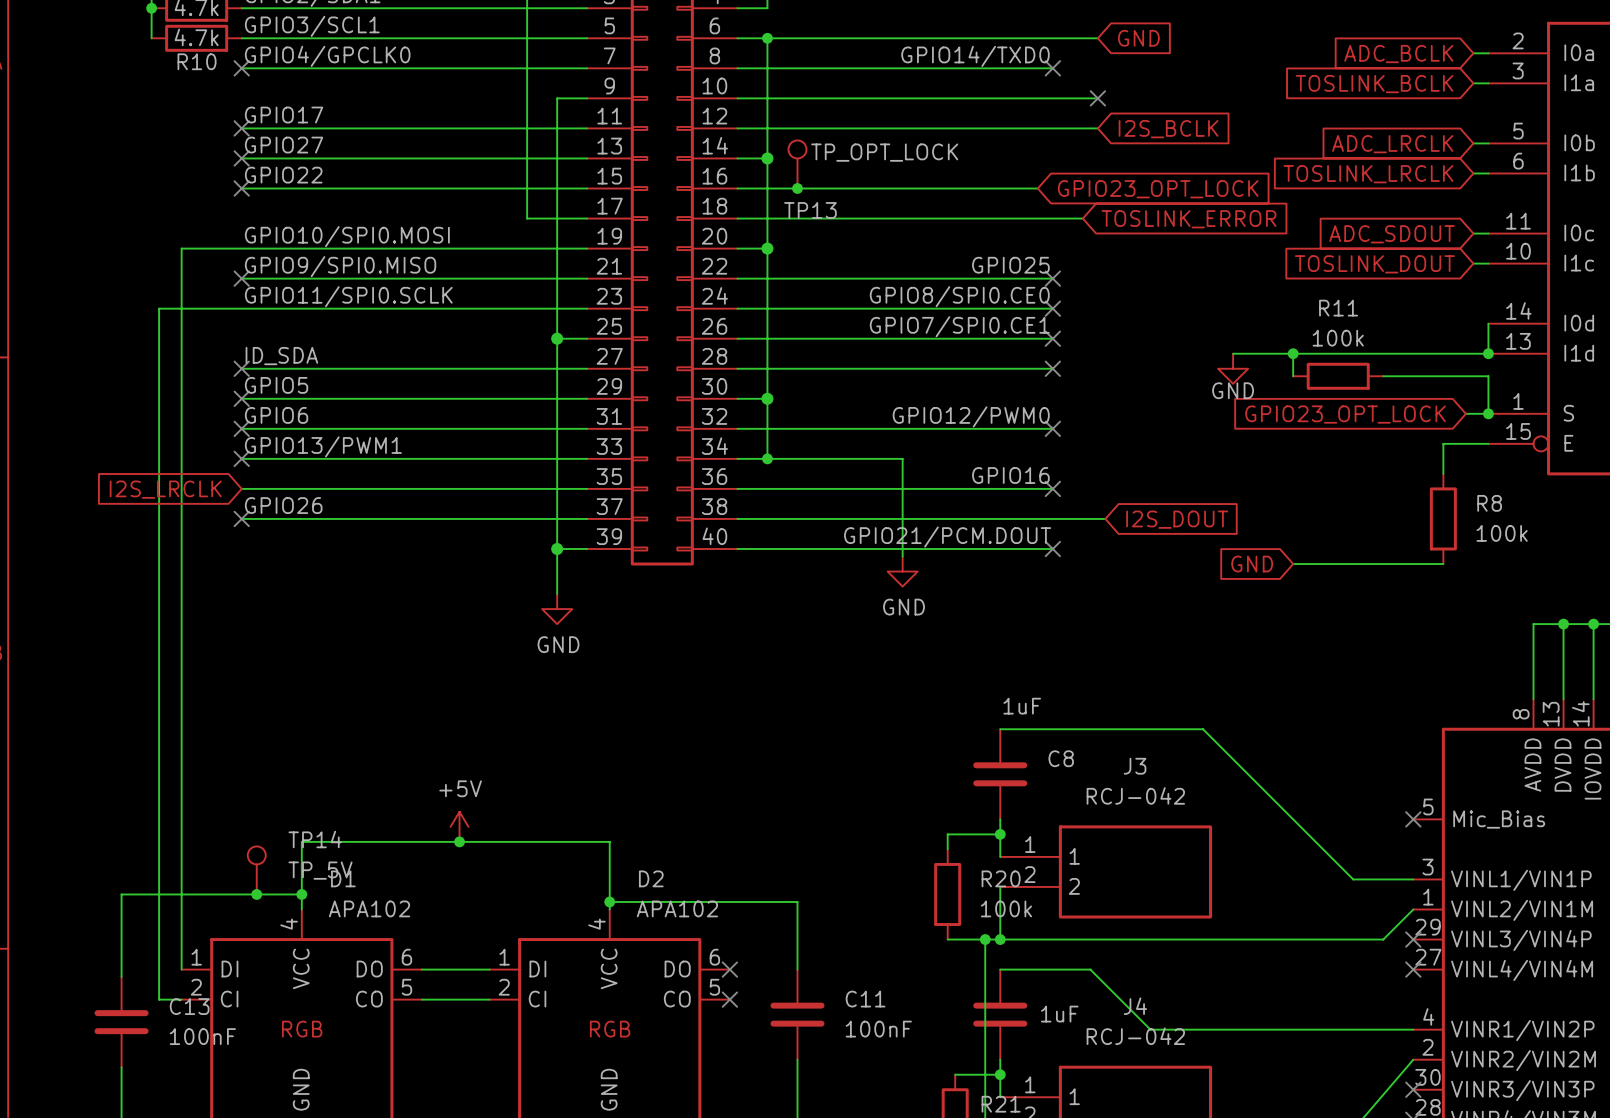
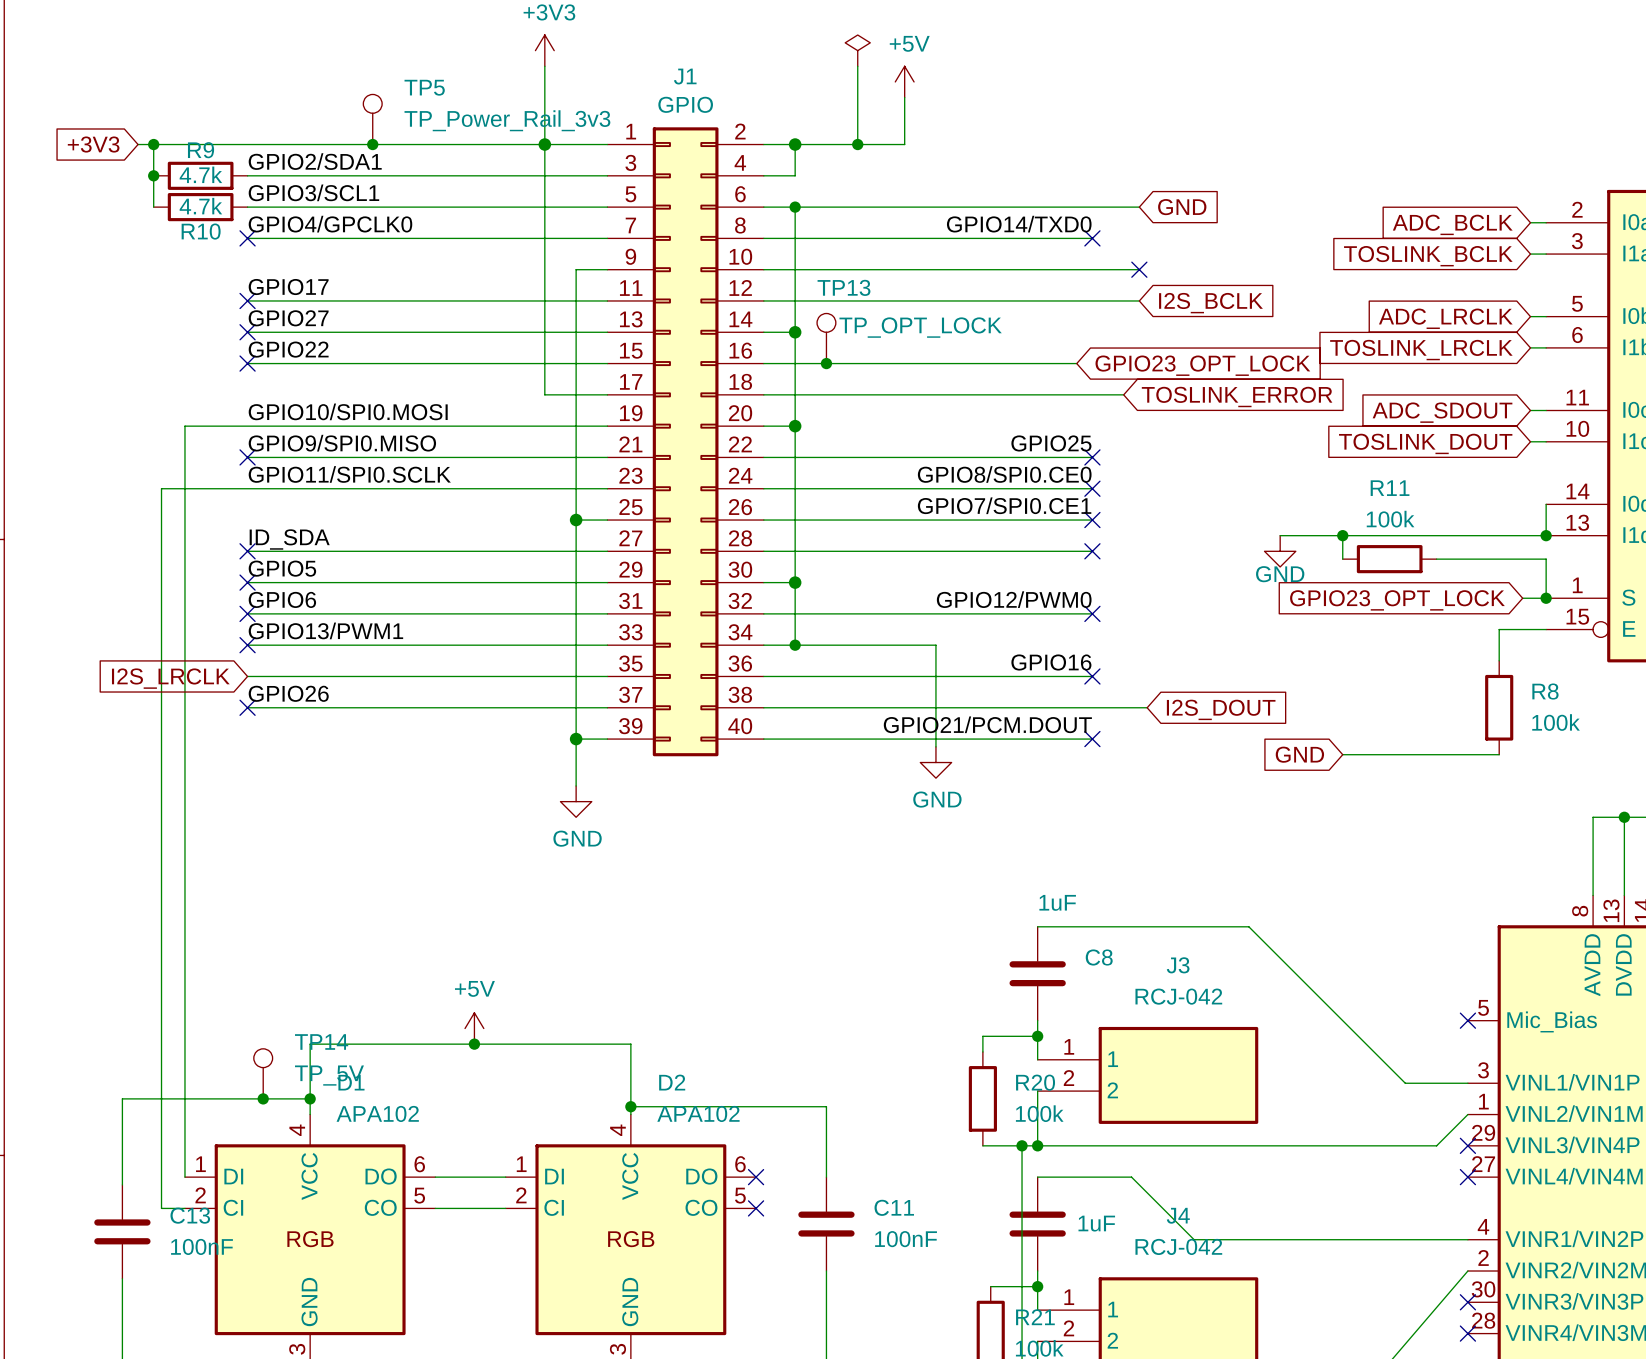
TP13 name position: TP13 (810, 210) -> TP13 (843, 287)

